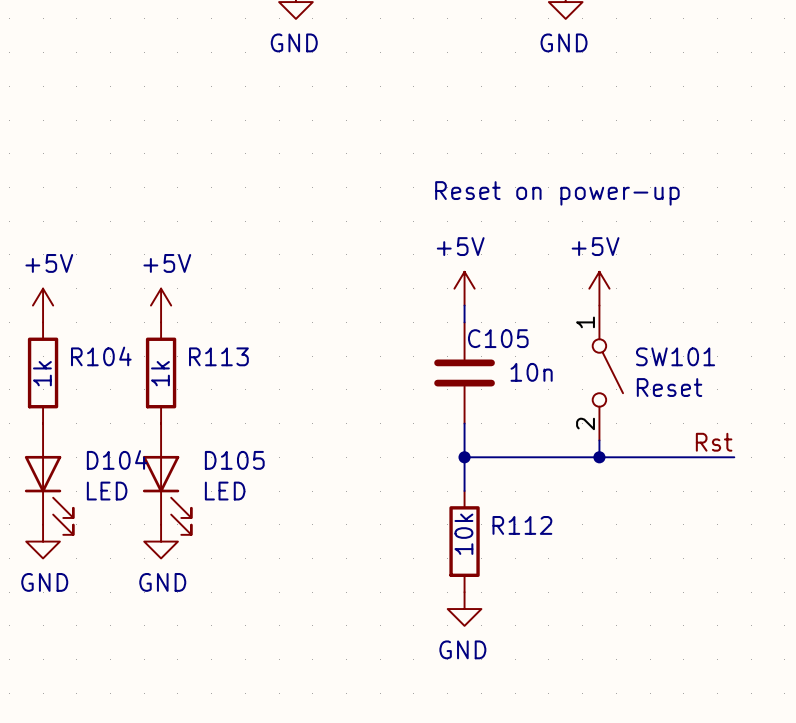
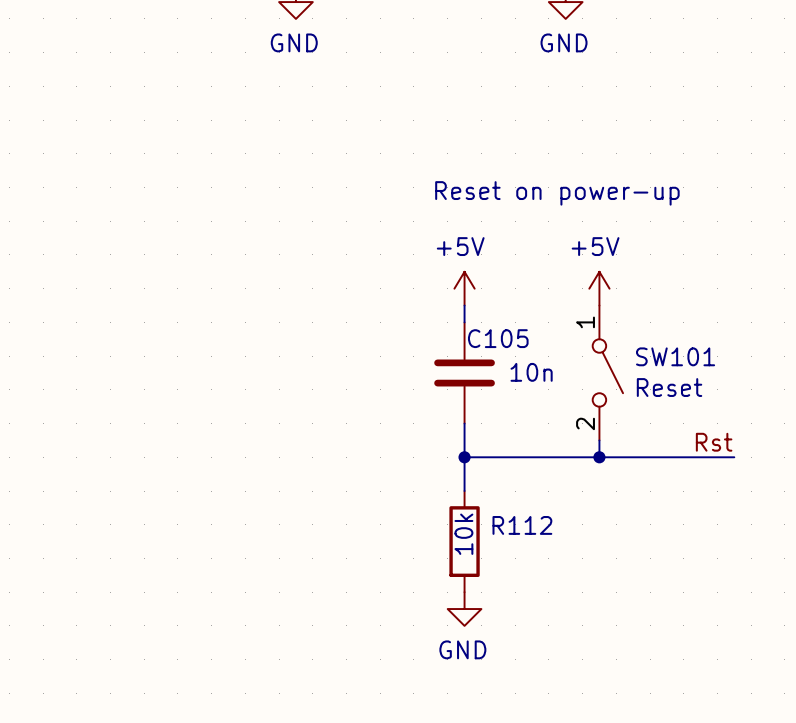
power symbol: +5V (43, 305) -> none
power symbol: +5V (161, 305) -> none
R104: 1k (43, 372) -> none
R113: 1k (161, 372) -> none
D104: LED (49, 479) -> none
D105: LED (167, 479) -> none
power symbol: GND (43, 541) -> none
power symbol: GND (161, 541) -> none

